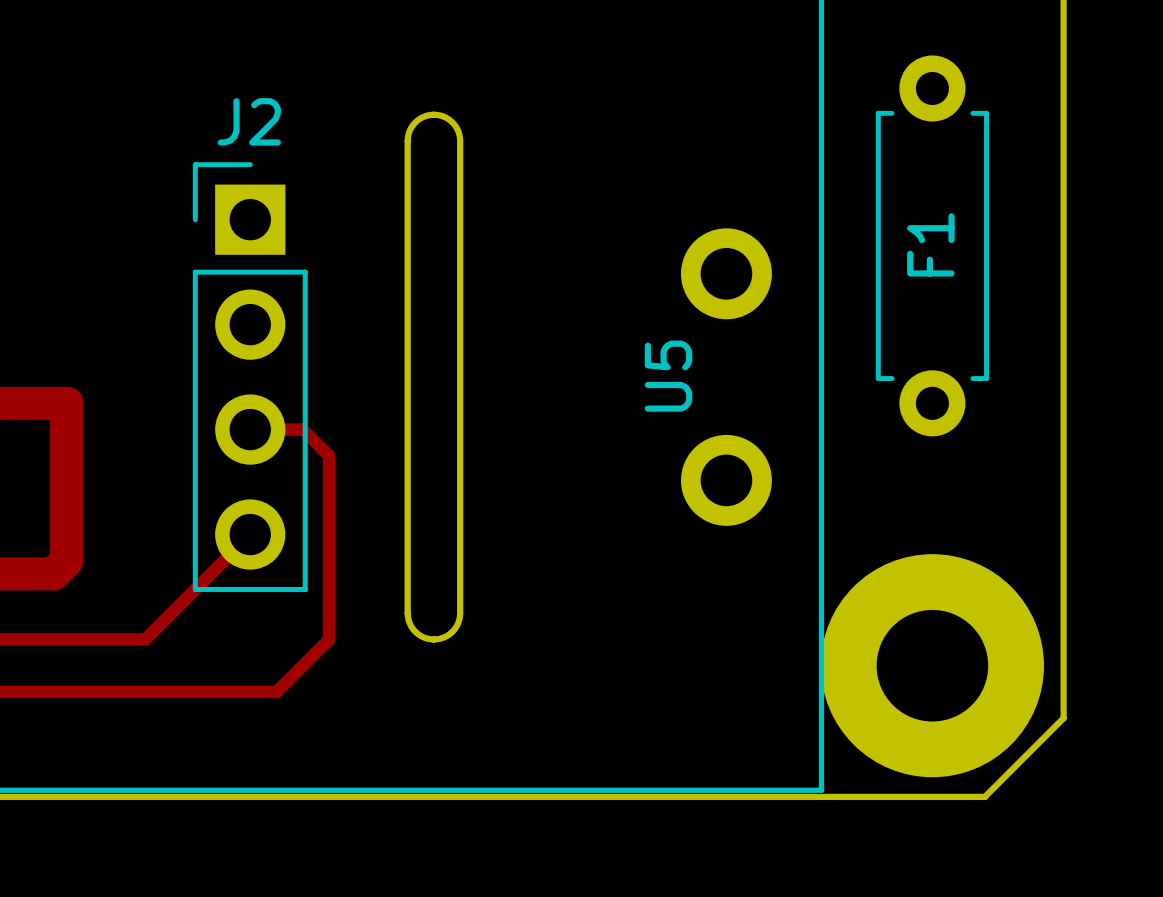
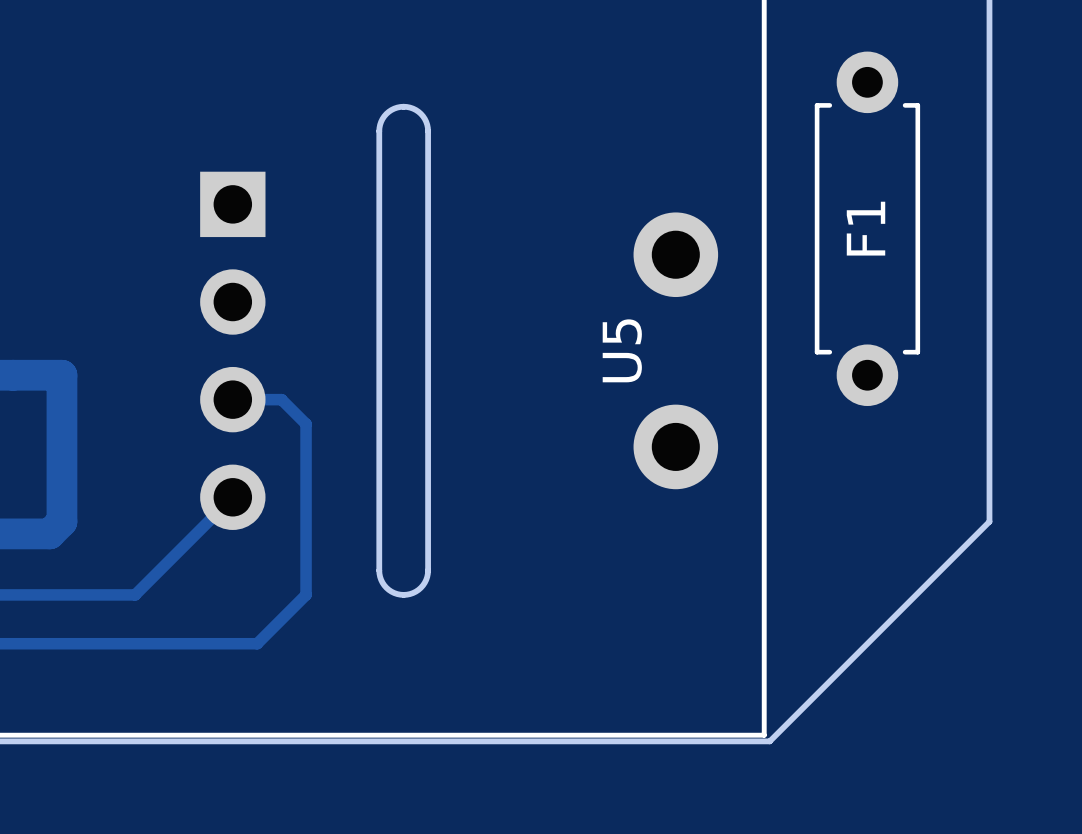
J2 side: top (250, 377) -> bottom (232, 350)
board edge: (1063, 560) (1063, 718) (984, 796) (827, 796) -> (989, 521) (769, 741)
part: (932, 665) -> none

